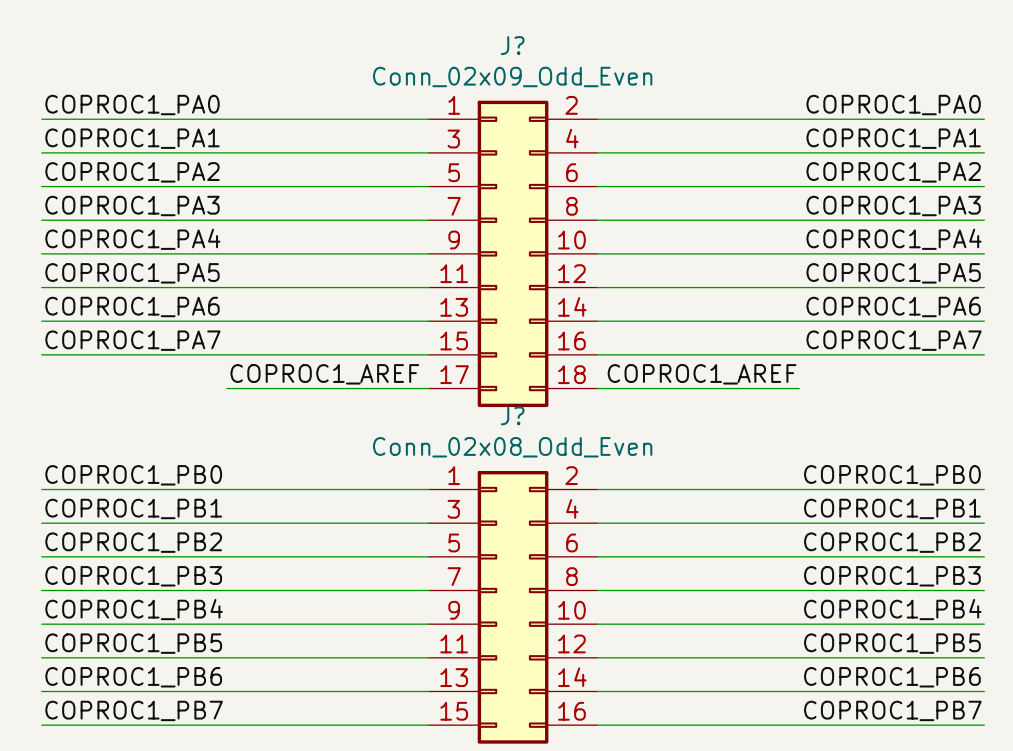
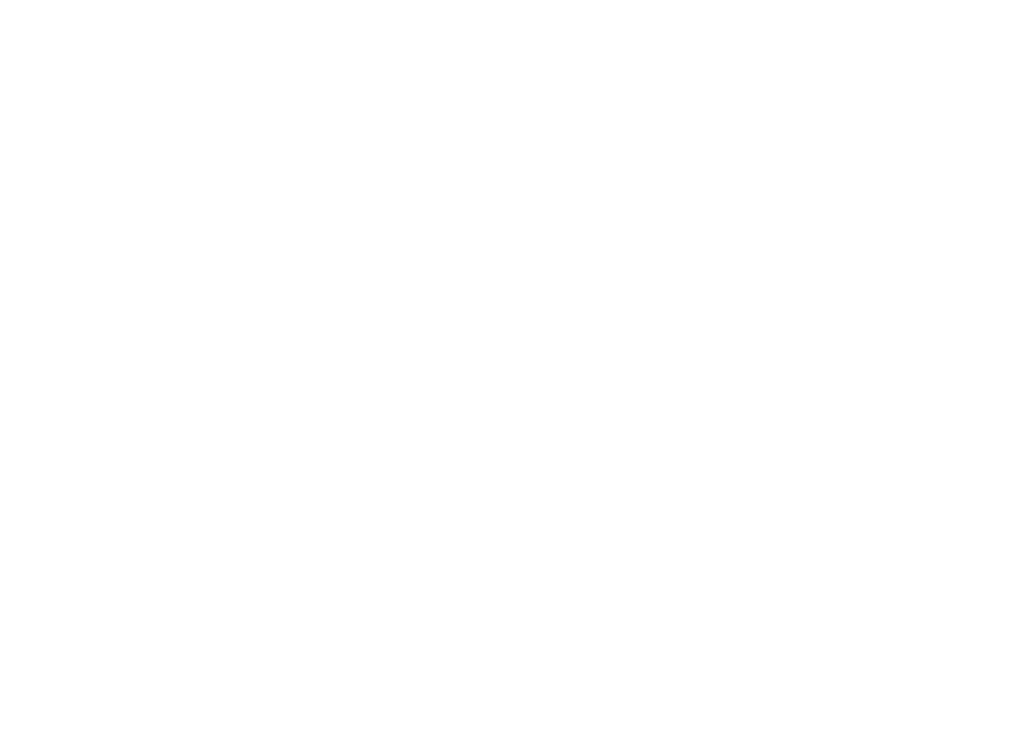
label: COPROC1_PA0 (132, 105) -> none
label: COPROC1_PA0 (893, 105) -> none
wire: (41, 119) (428, 119) -> none
wire: (597, 119) (984, 119) -> none
label: COPROC1_PA1 (132, 138) -> none
label: COPROC1_PA1 (893, 138) -> none
wire: (41, 152) (428, 152) -> none
wire: (597, 152) (984, 152) -> none
label: COPROC1_PA2 (132, 172) -> none
label: COPROC1_PA2 (893, 172) -> none
wire: (41, 186) (428, 186) -> none
wire: (597, 186) (984, 186) -> none
label: COPROC1_PA3 (132, 206) -> none
label: COPROC1_PA3 (893, 206) -> none
wire: (41, 220) (428, 220) -> none
wire: (597, 220) (984, 220) -> none
label: COPROC1_PA4 (132, 239) -> none
label: COPROC1_PA4 (894, 239) -> none
wire: (41, 253) (428, 253) -> none
J?: Conn_02x09_Odd_Even (513, 253) -> none
wire: (597, 253) (984, 253) -> none
label: COPROC1_PA5 (132, 273) -> none
label: COPROC1_PA5 (893, 273) -> none
wire: (41, 287) (428, 287) -> none
wire: (597, 287) (984, 287) -> none
label: COPROC1_PA6 (132, 306) -> none
label: COPROC1_PA6 (893, 306) -> none
wire: (41, 321) (428, 321) -> none
wire: (597, 321) (984, 321) -> none
label: COPROC1_PA7 (132, 340) -> none
label: COPROC1_PA7 (894, 340) -> none
wire: (41, 354) (428, 354) -> none
wire: (597, 354) (984, 354) -> none
label: COPROC1_AREF (324, 374) -> none
label: COPROC1_AREF (702, 374) -> none
wire: (226, 388) (428, 388) -> none
wire: (597, 388) (799, 388) -> none
label: COPROC1_PB0 (133, 475) -> none
label: COPROC1_PB0 (892, 475) -> none
wire: (41, 489) (428, 489) -> none
wire: (597, 489) (984, 489) -> none
label: COPROC1_PB1 (133, 508) -> none
label: COPROC1_PB1 (892, 508) -> none
wire: (41, 523) (428, 523) -> none
wire: (597, 523) (984, 523) -> none
label: COPROC1_PB2 (133, 542) -> none
label: COPROC1_PB2 (892, 542) -> none
wire: (41, 556) (428, 556) -> none
wire: (597, 556) (984, 556) -> none
label: COPROC1_PB3 (133, 576) -> none
label: COPROC1_PB3 (892, 576) -> none
wire: (41, 590) (428, 590) -> none
wire: (597, 590) (984, 590) -> none
J?: Conn_02x08_Odd_Even (513, 607) -> none
label: COPROC1_PB4 (134, 609) -> none
label: COPROC1_PB4 (892, 609) -> none
wire: (41, 624) (428, 624) -> none
wire: (597, 624) (984, 624) -> none
label: COPROC1_PB5 (133, 643) -> none
label: COPROC1_PB5 (892, 643) -> none
wire: (41, 657) (428, 657) -> none
wire: (597, 657) (984, 657) -> none
label: COPROC1_PB6 (133, 677) -> none
label: COPROC1_PB6 (892, 677) -> none
wire: (41, 691) (428, 691) -> none
wire: (597, 691) (984, 691) -> none
label: COPROC1_PB7 (134, 710) -> none
label: COPROC1_PB7 (892, 710) -> none
wire: (41, 725) (428, 725) -> none
wire: (597, 725) (984, 725) -> none

